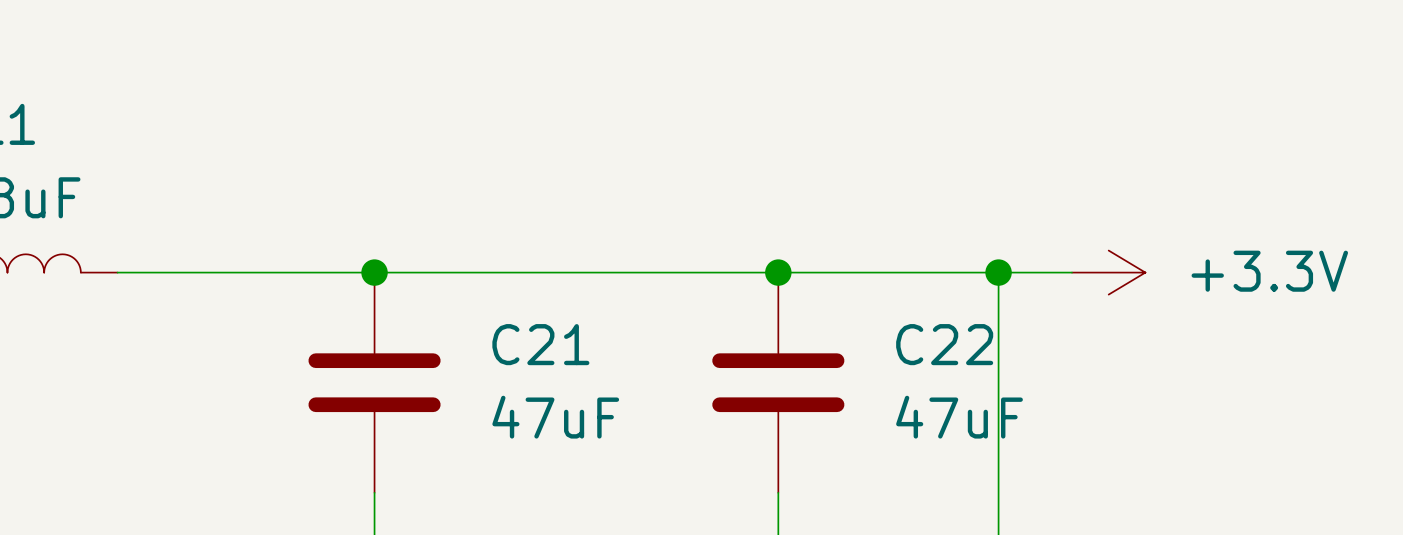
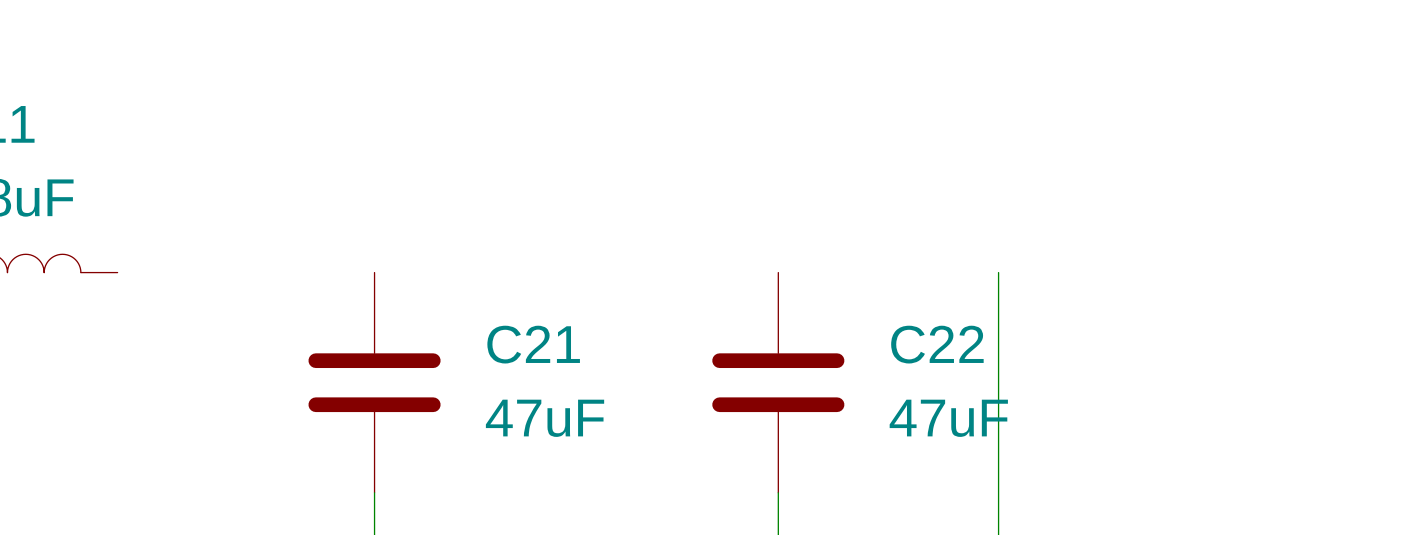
wire: (117, 272) (1071, 272) -> none
junction: (374, 272) -> none
junction: (778, 272) -> none
junction: (998, 272) -> none
power symbol: +3.3V (1108, 272) -> none

